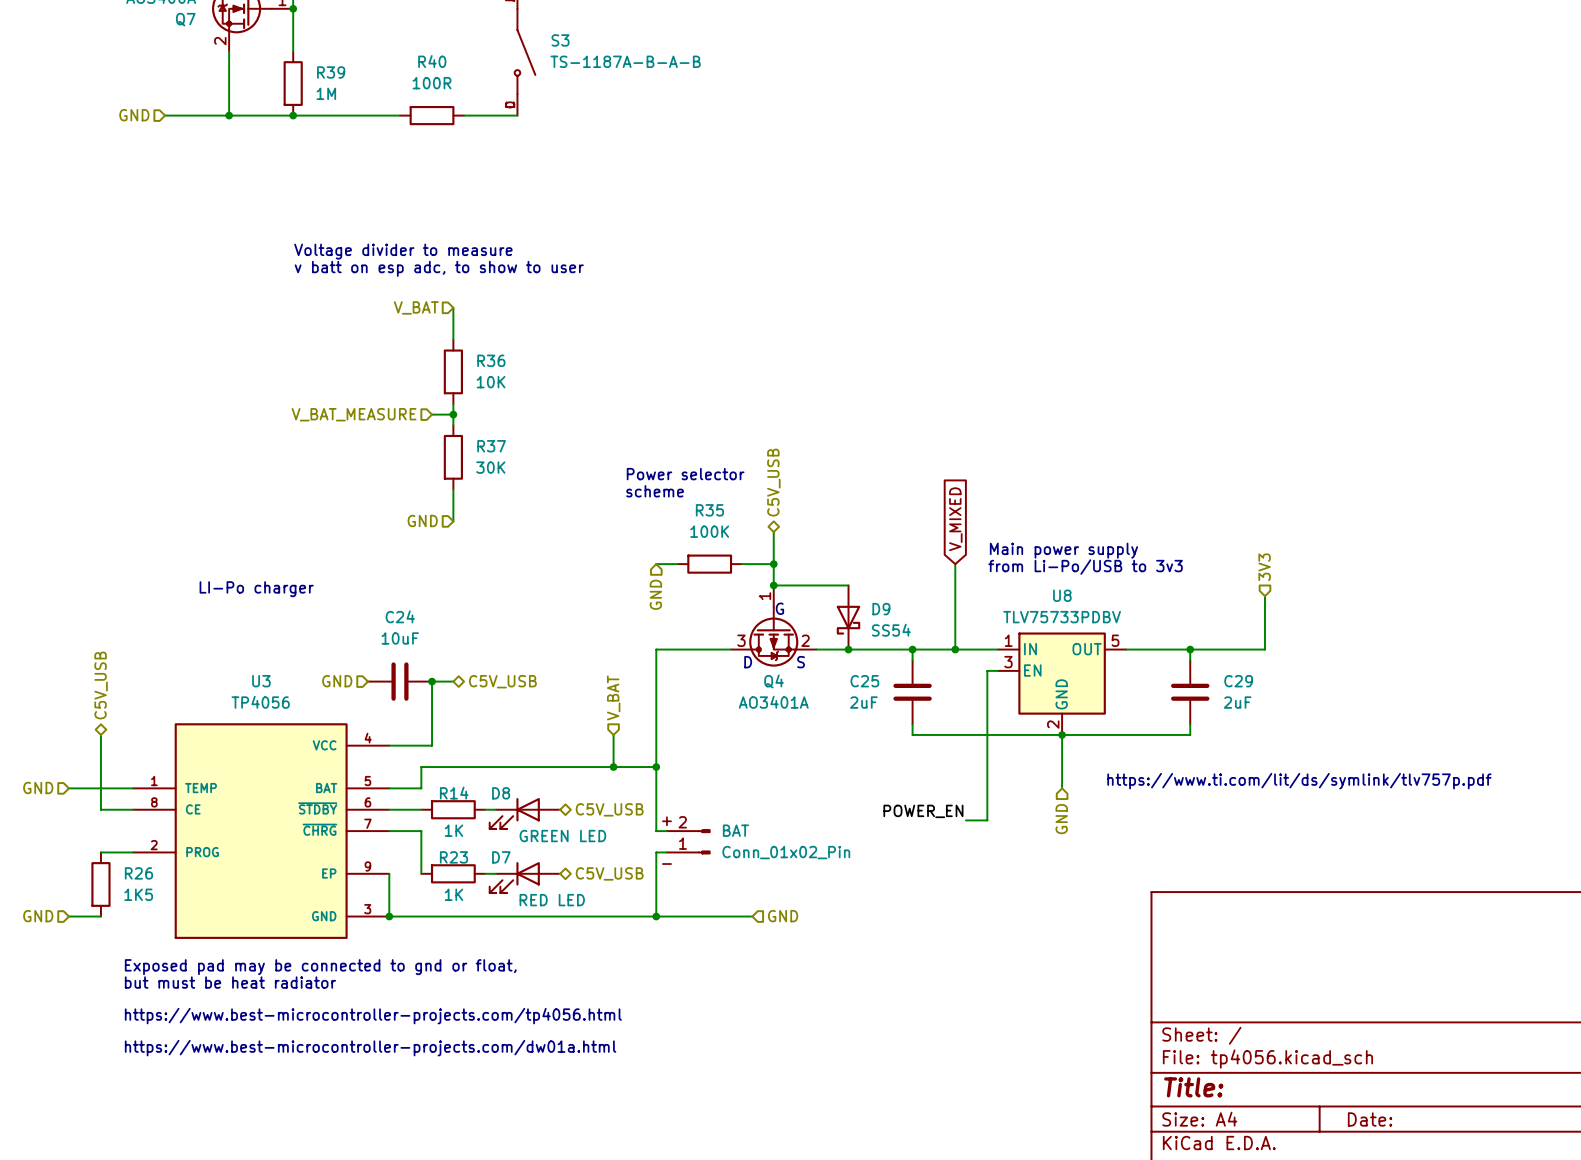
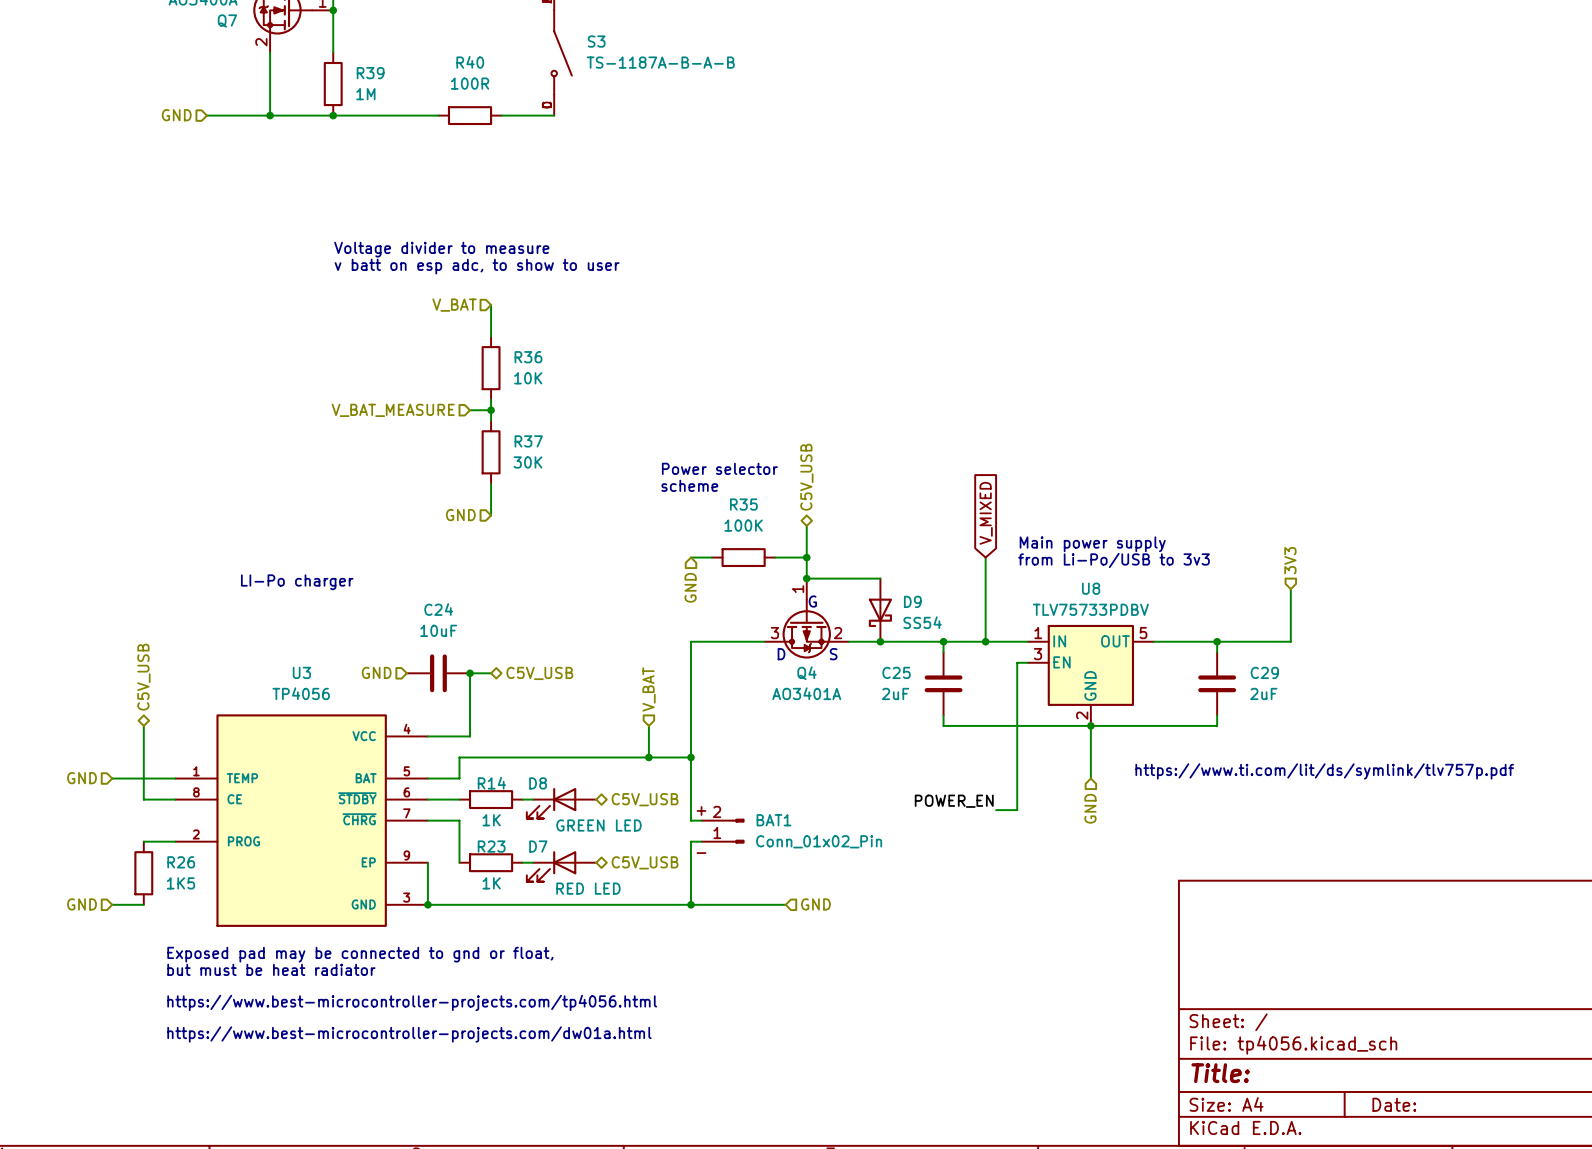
BAT name: BAT (735, 830) -> BAT1 (774, 820)

